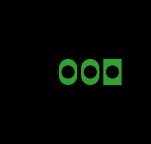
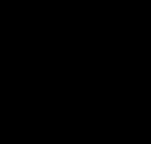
part: (90, 71) -> none

